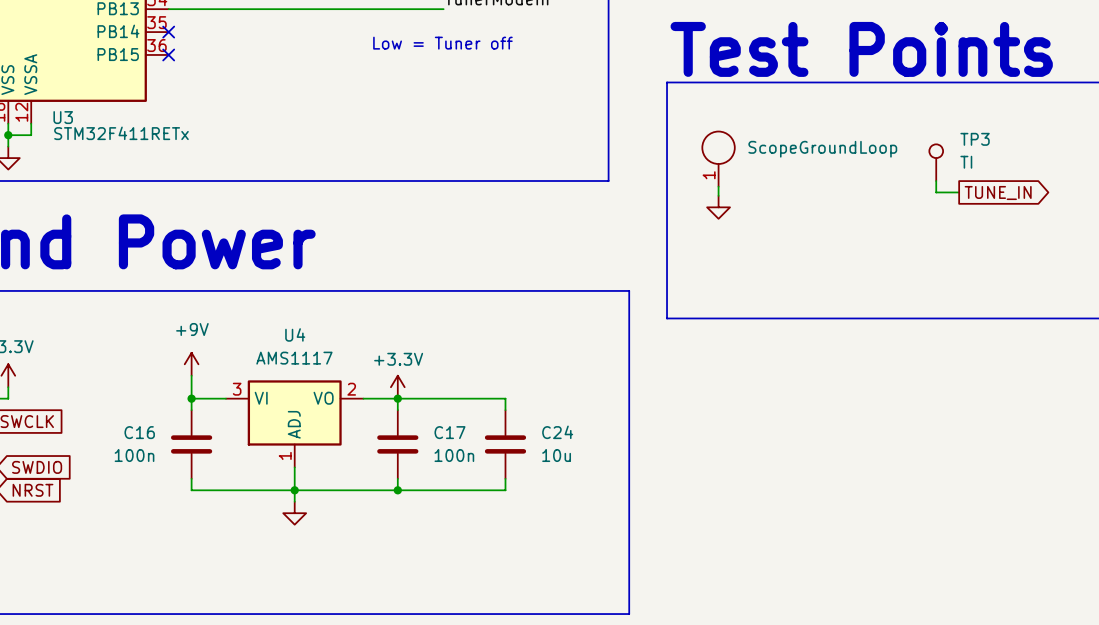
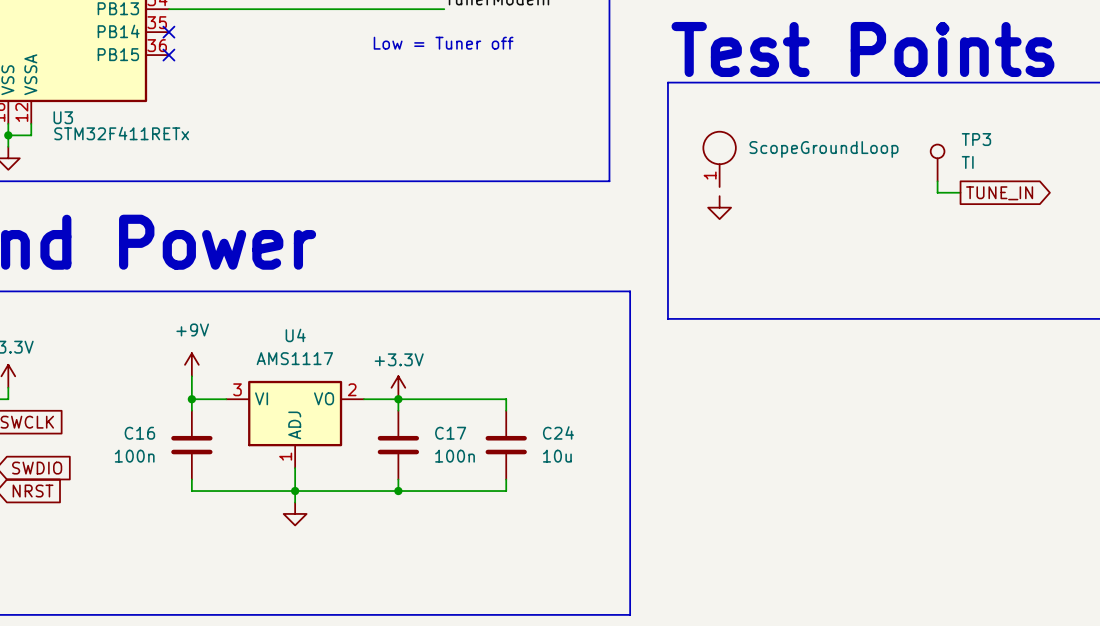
wire: (718, 186) (718, 195) -> none

